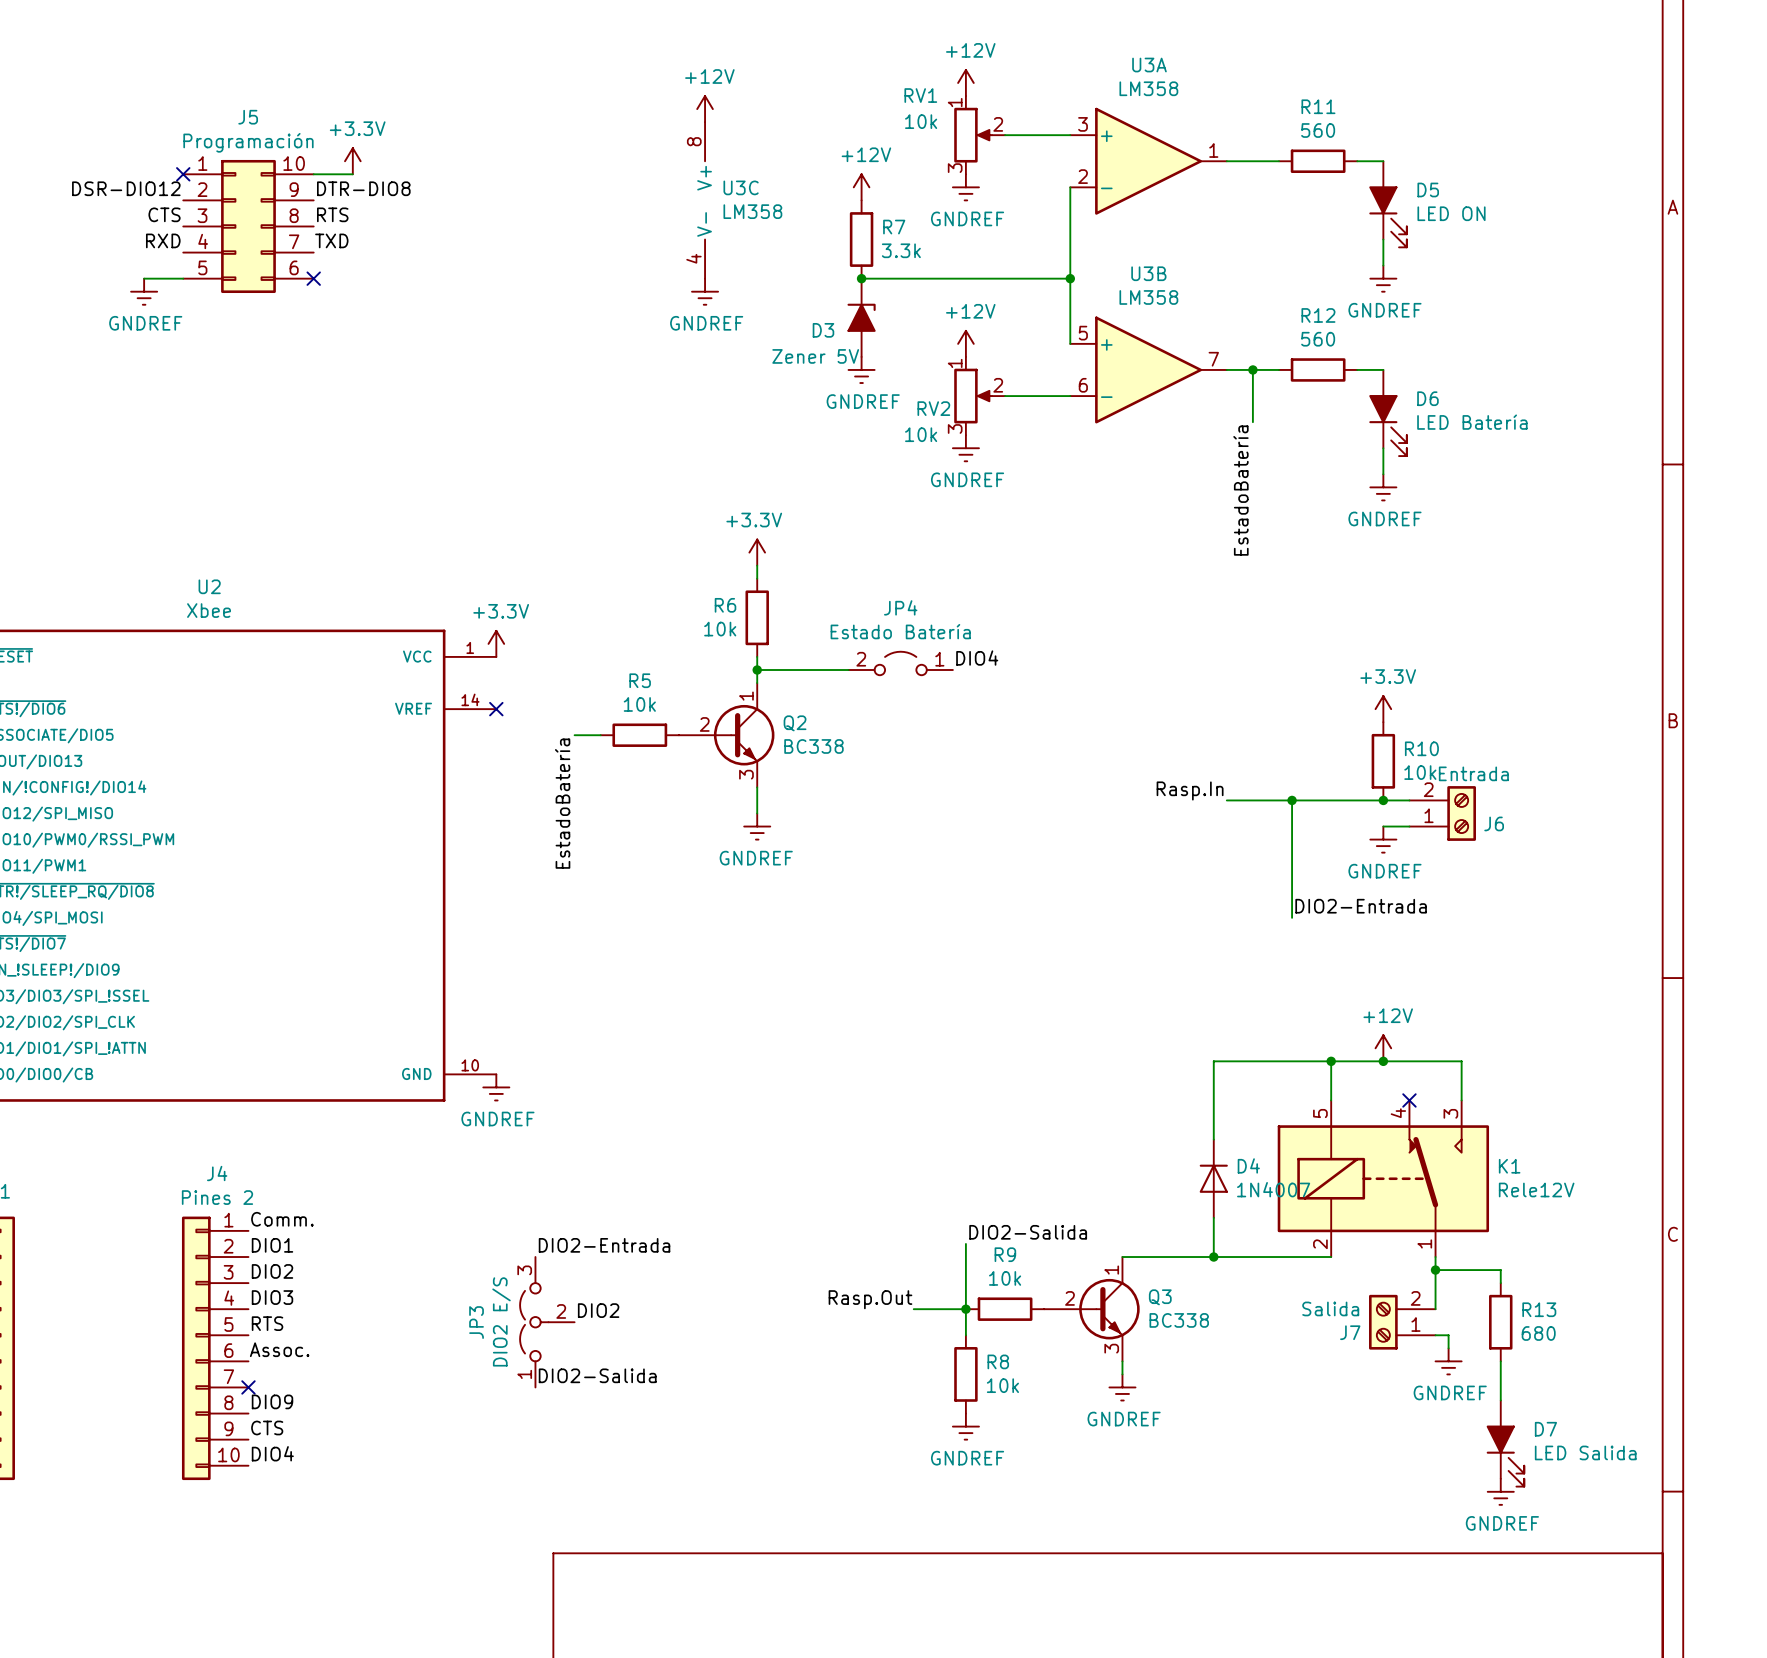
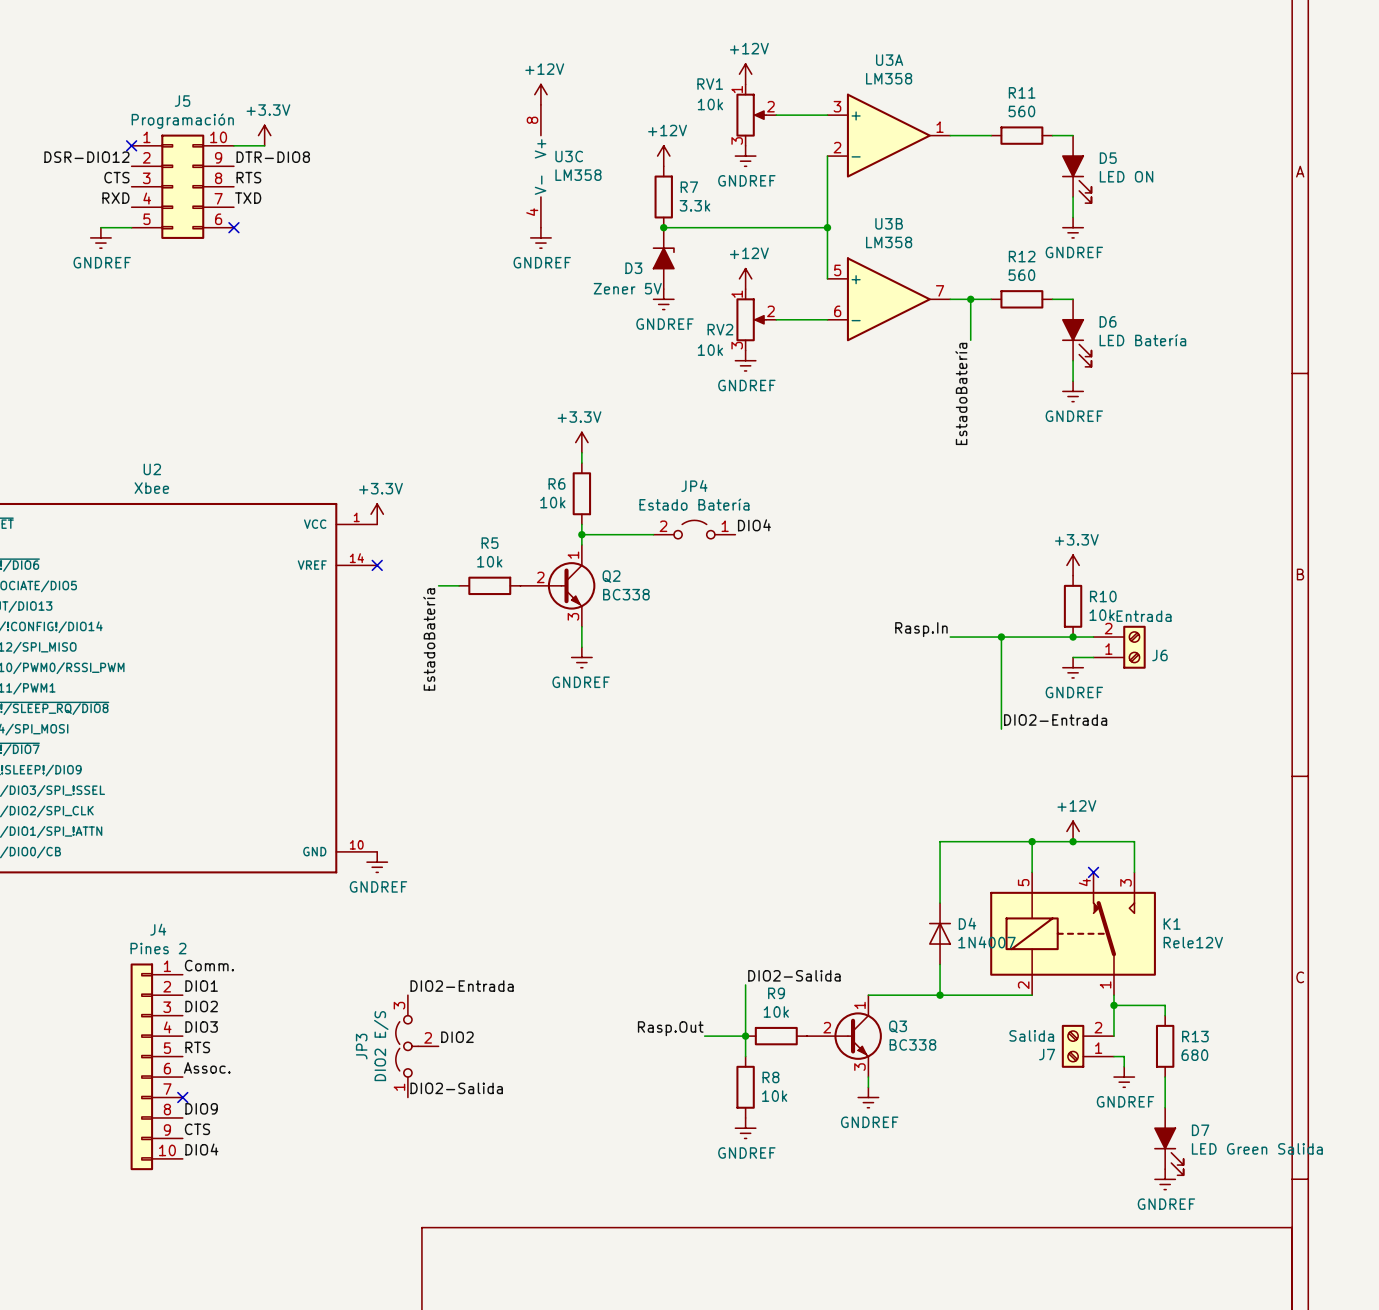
D7 value: LED Salida (1585, 1452) -> LED Green Salida (1257, 1148)

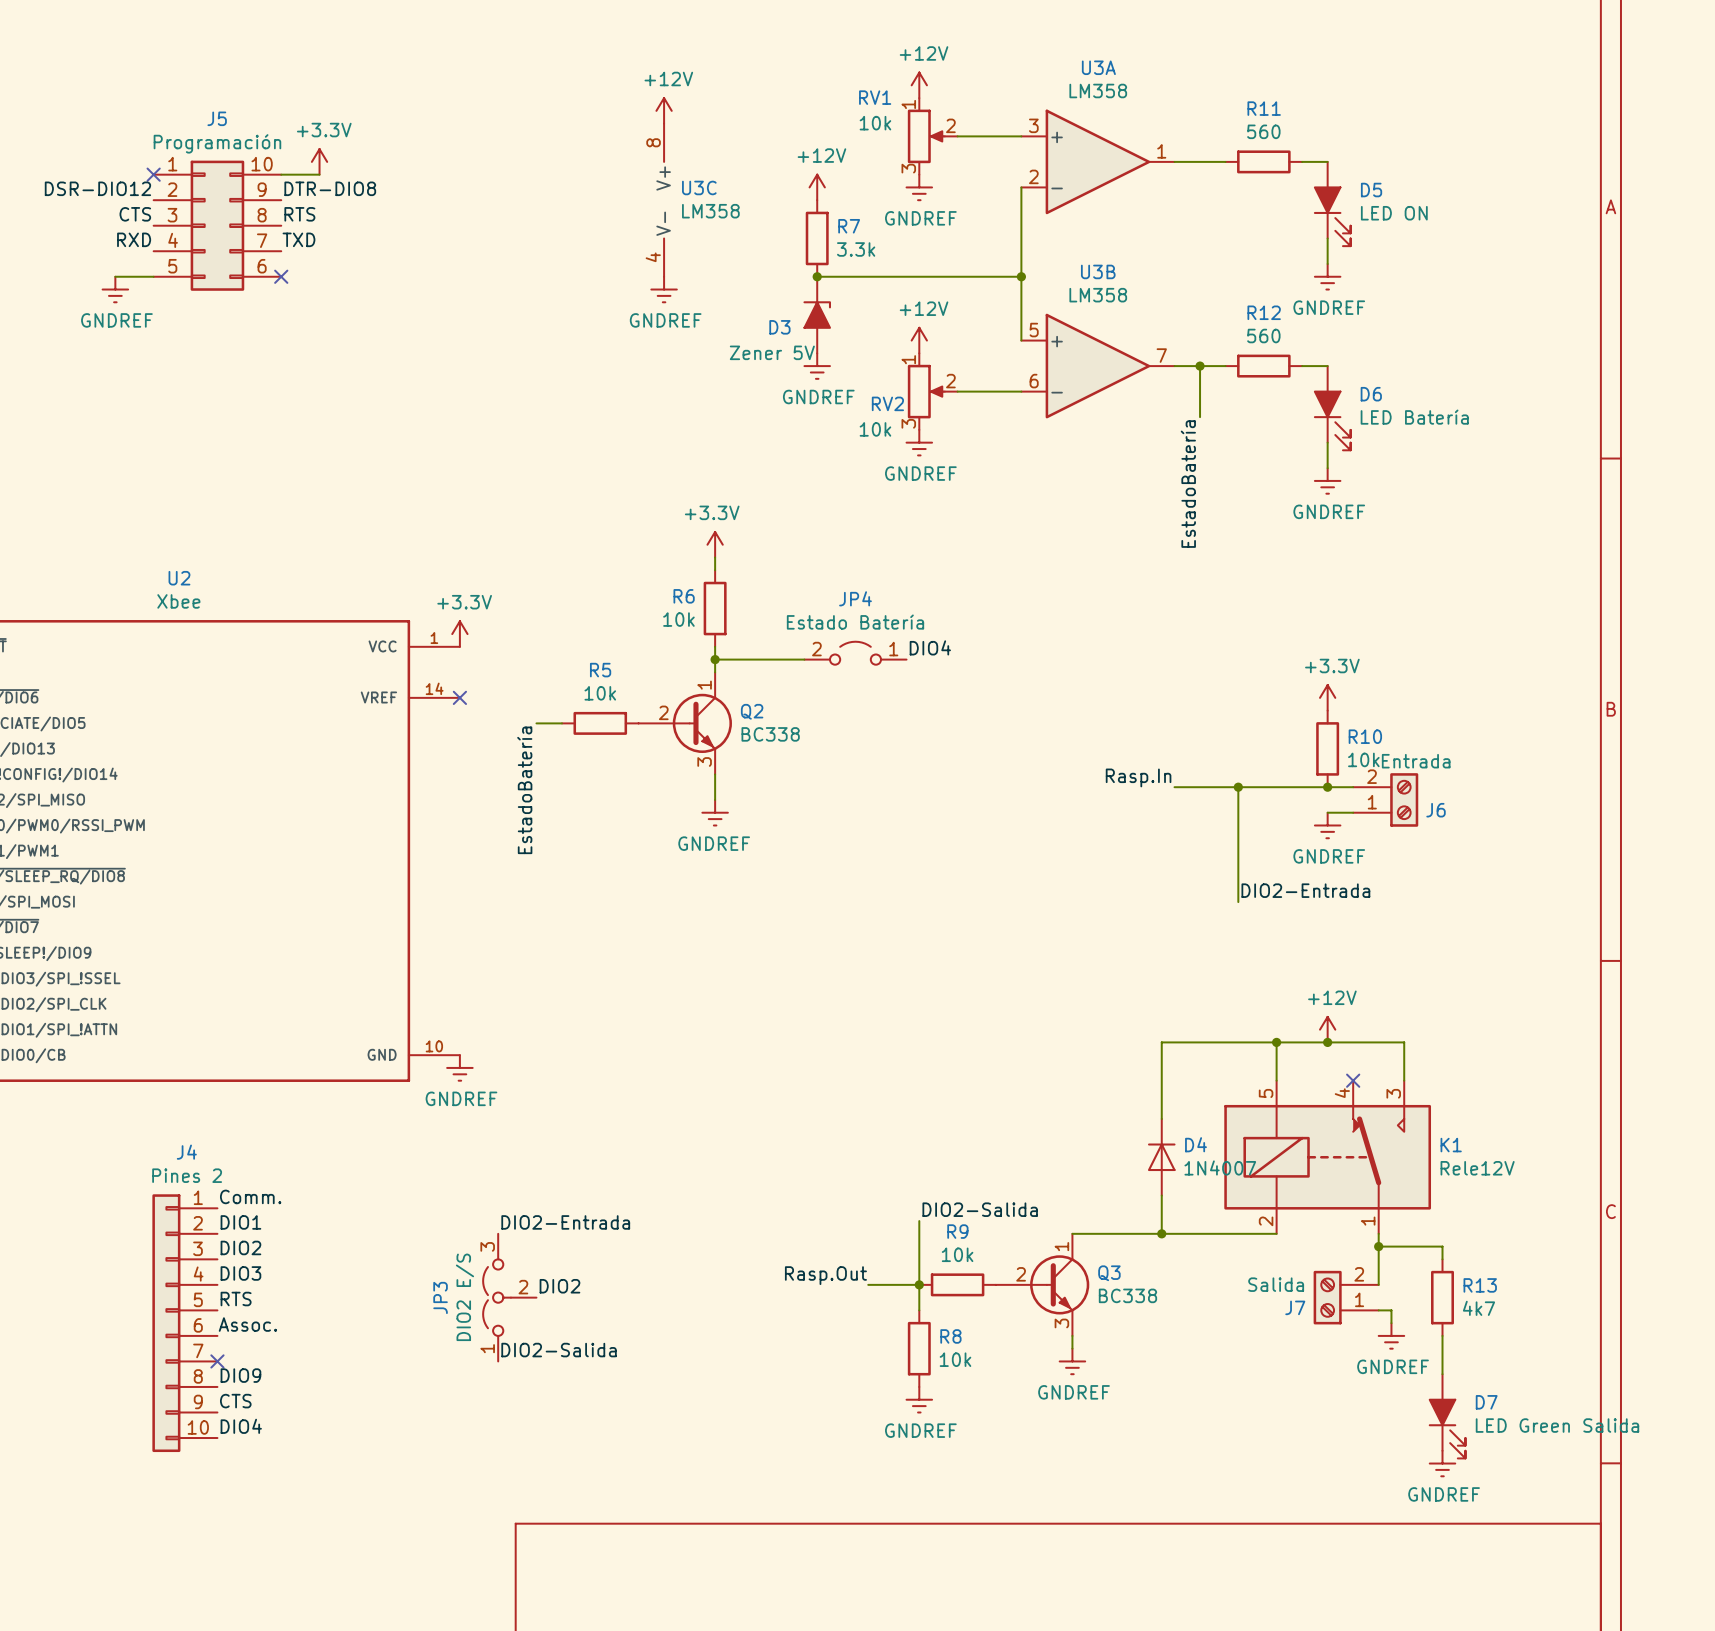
R13 value: 680 (1194, 1055) -> 4k7 (1478, 1308)

